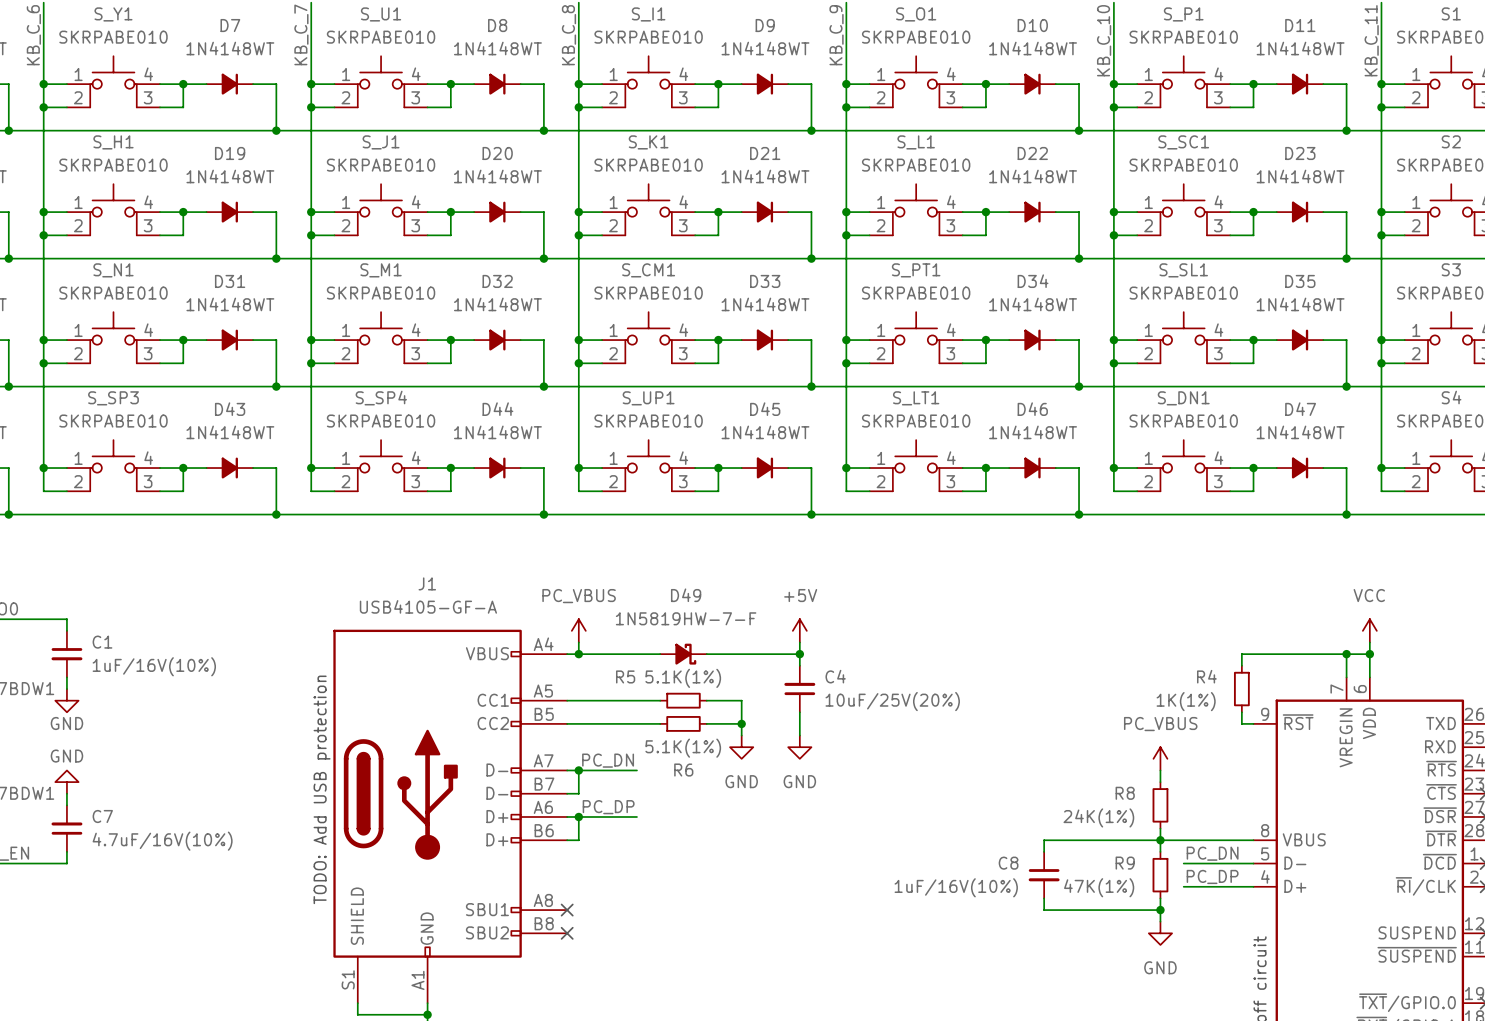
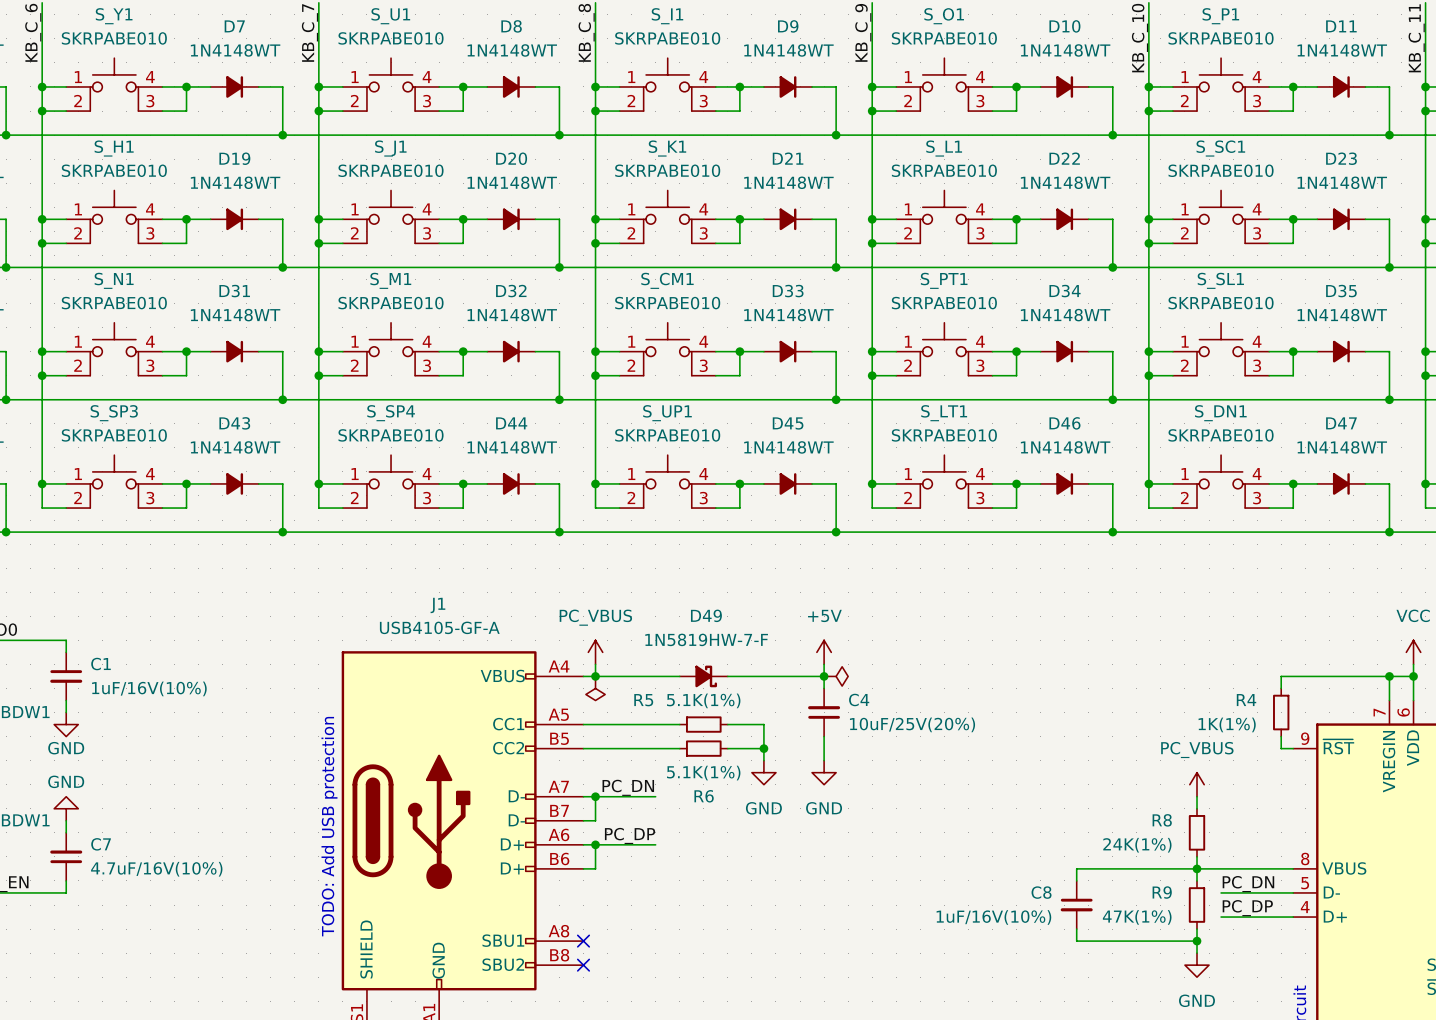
power symbol: none -> (836, 676)
power symbol: none -> (595, 688)

